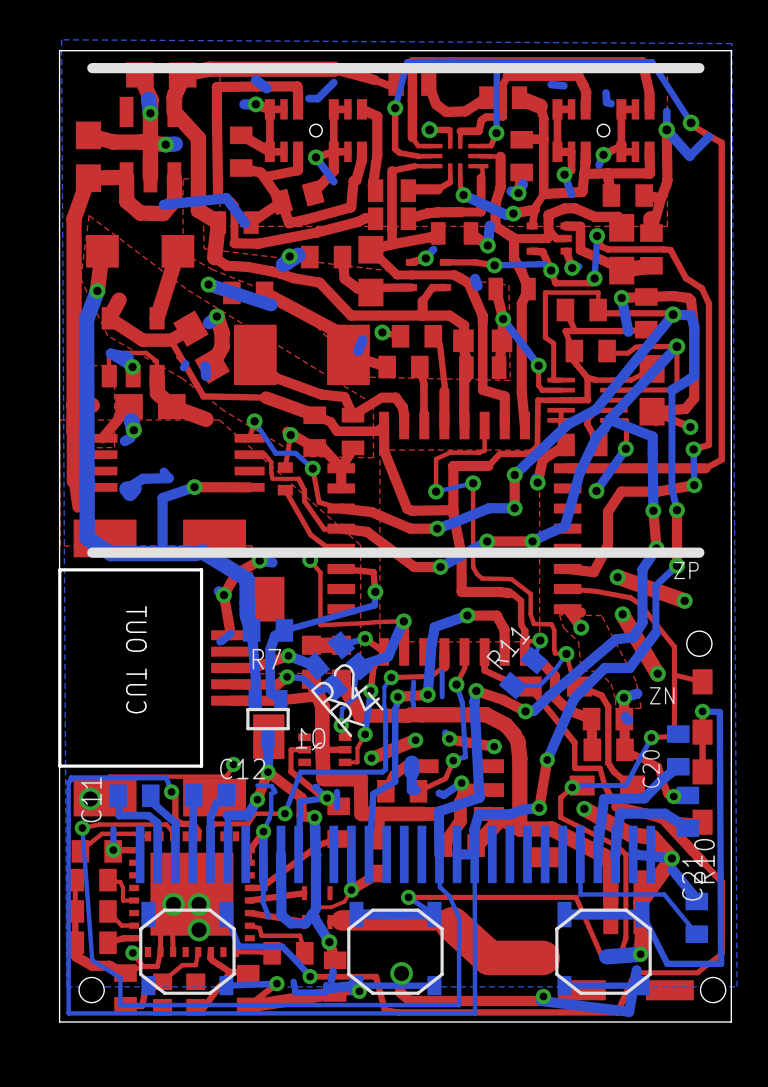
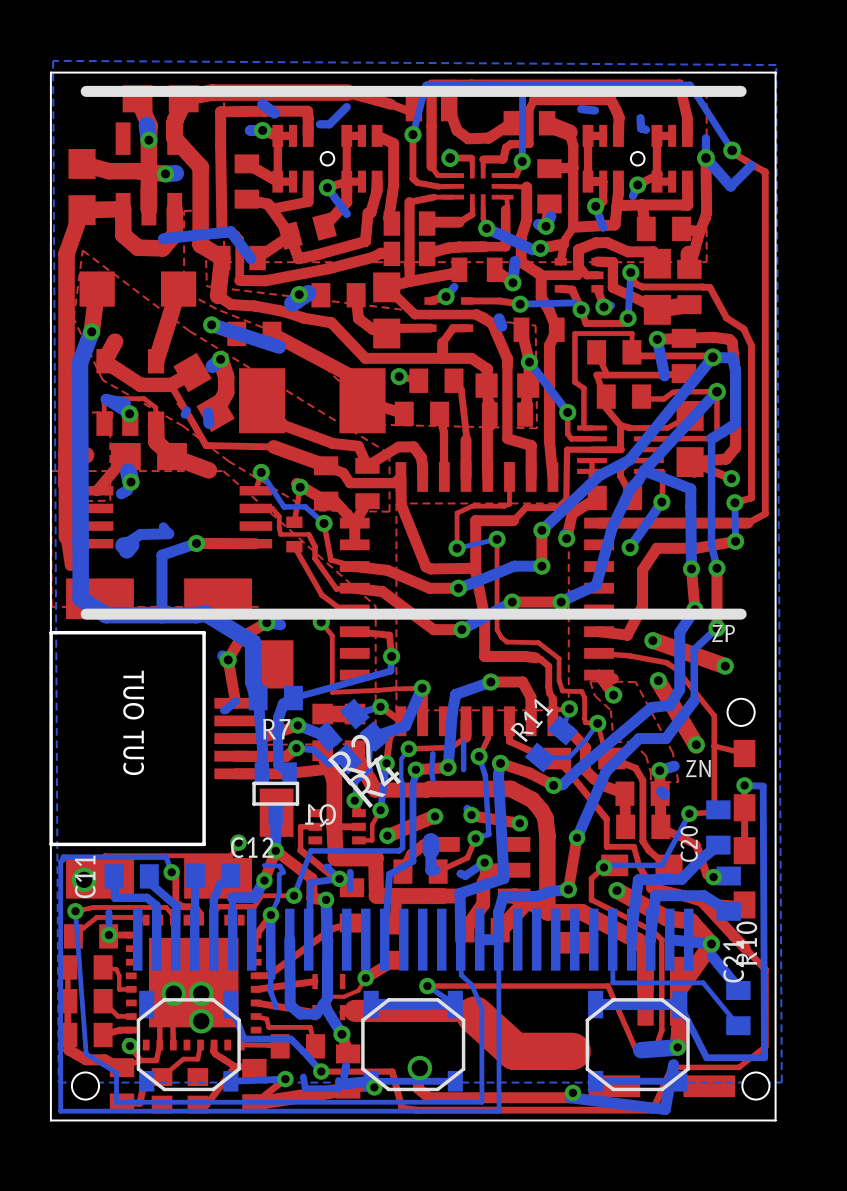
bottom track: (362, 340) (358, 351) -> none

